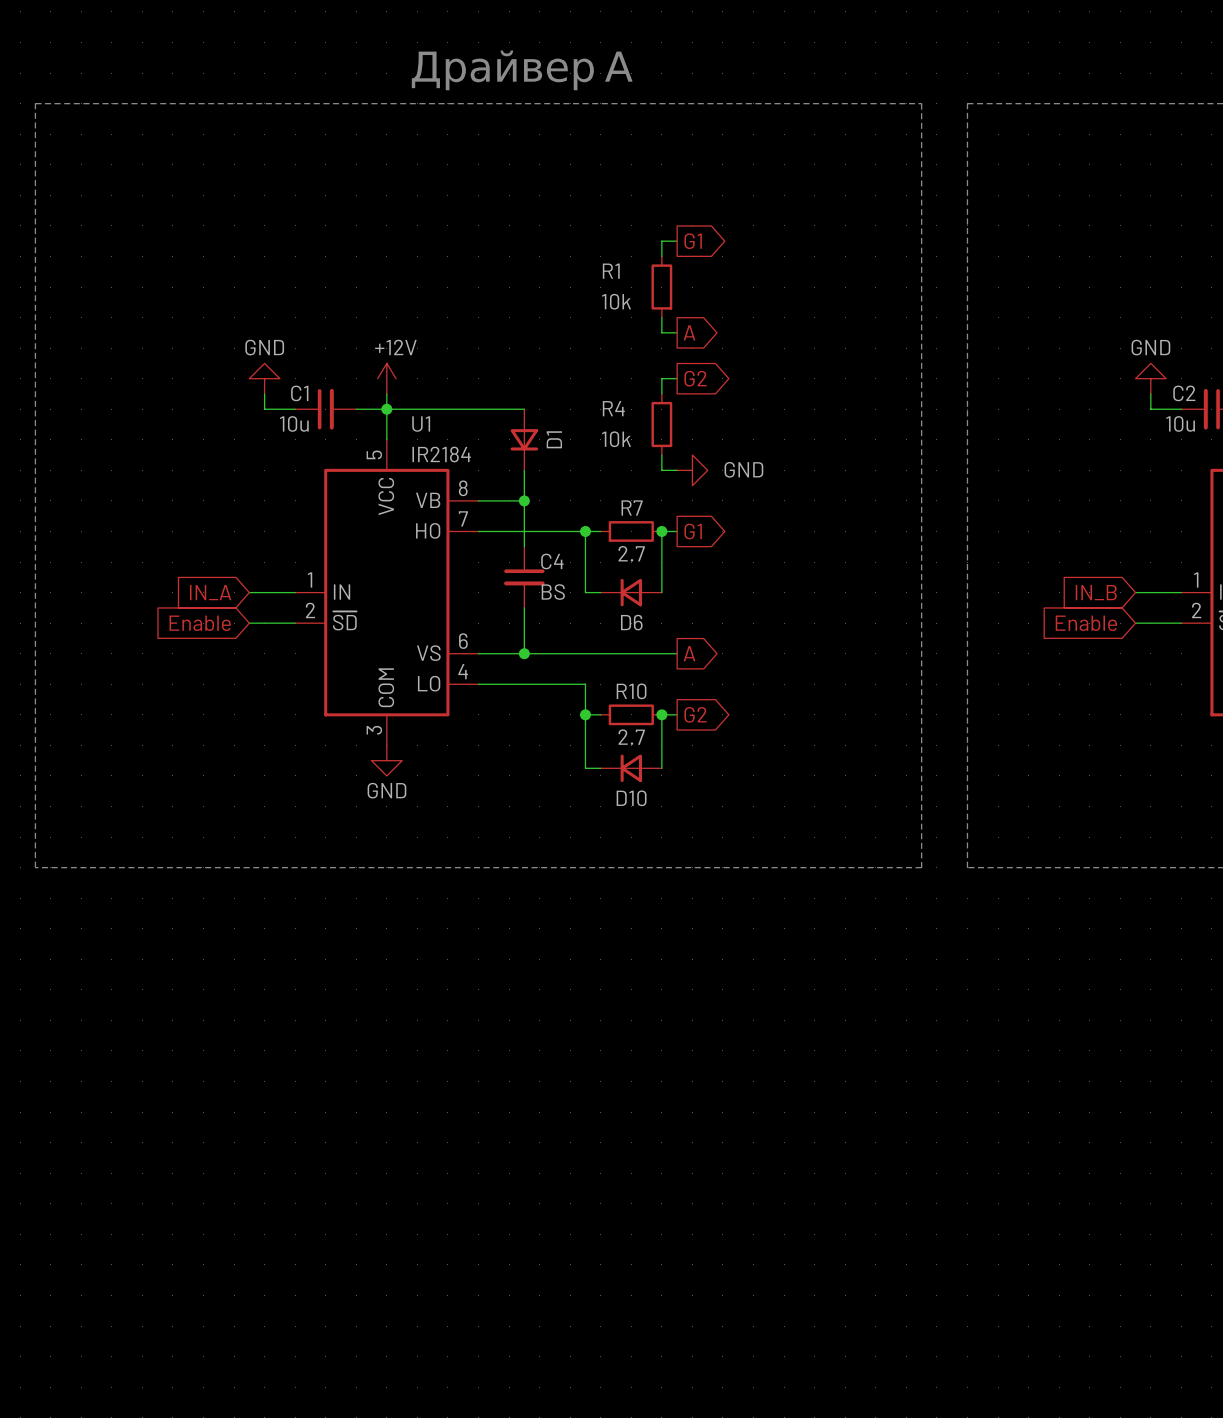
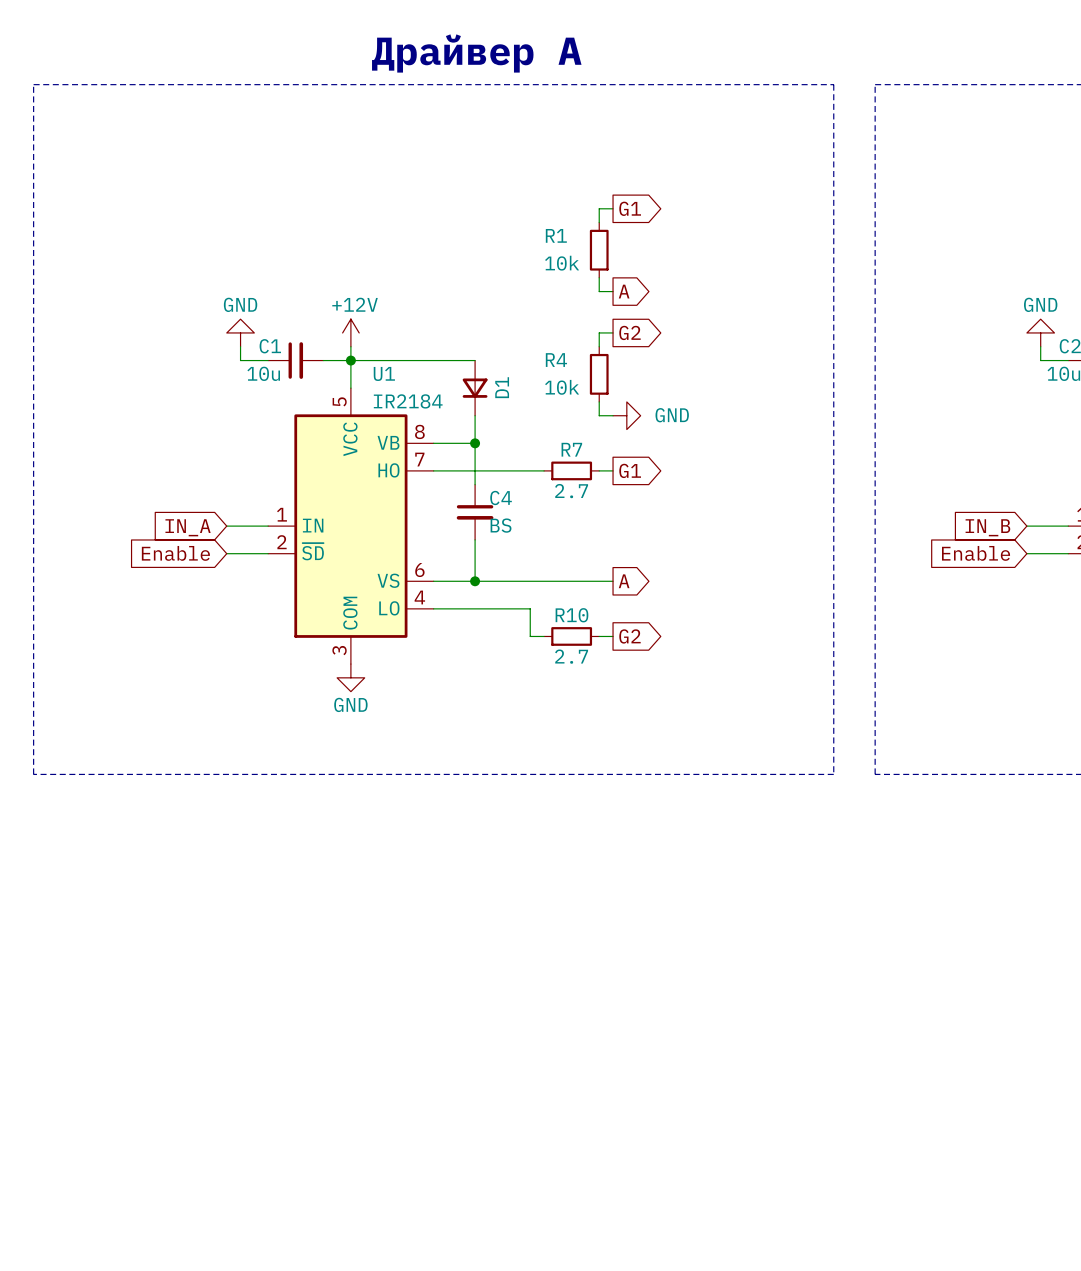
wire: (585, 531) (585, 592) (600, 592) -> none
junction: (585, 531) -> none
wire: (661, 531) (661, 592) -> none
junction: (661, 531) -> none
D6: (631, 592) -> none
wire: (585, 714) (585, 768) (600, 768) -> none
junction: (585, 714) -> none
wire: (661, 714) (661, 768) -> none
junction: (661, 714) -> none
D10: (631, 768) -> none

